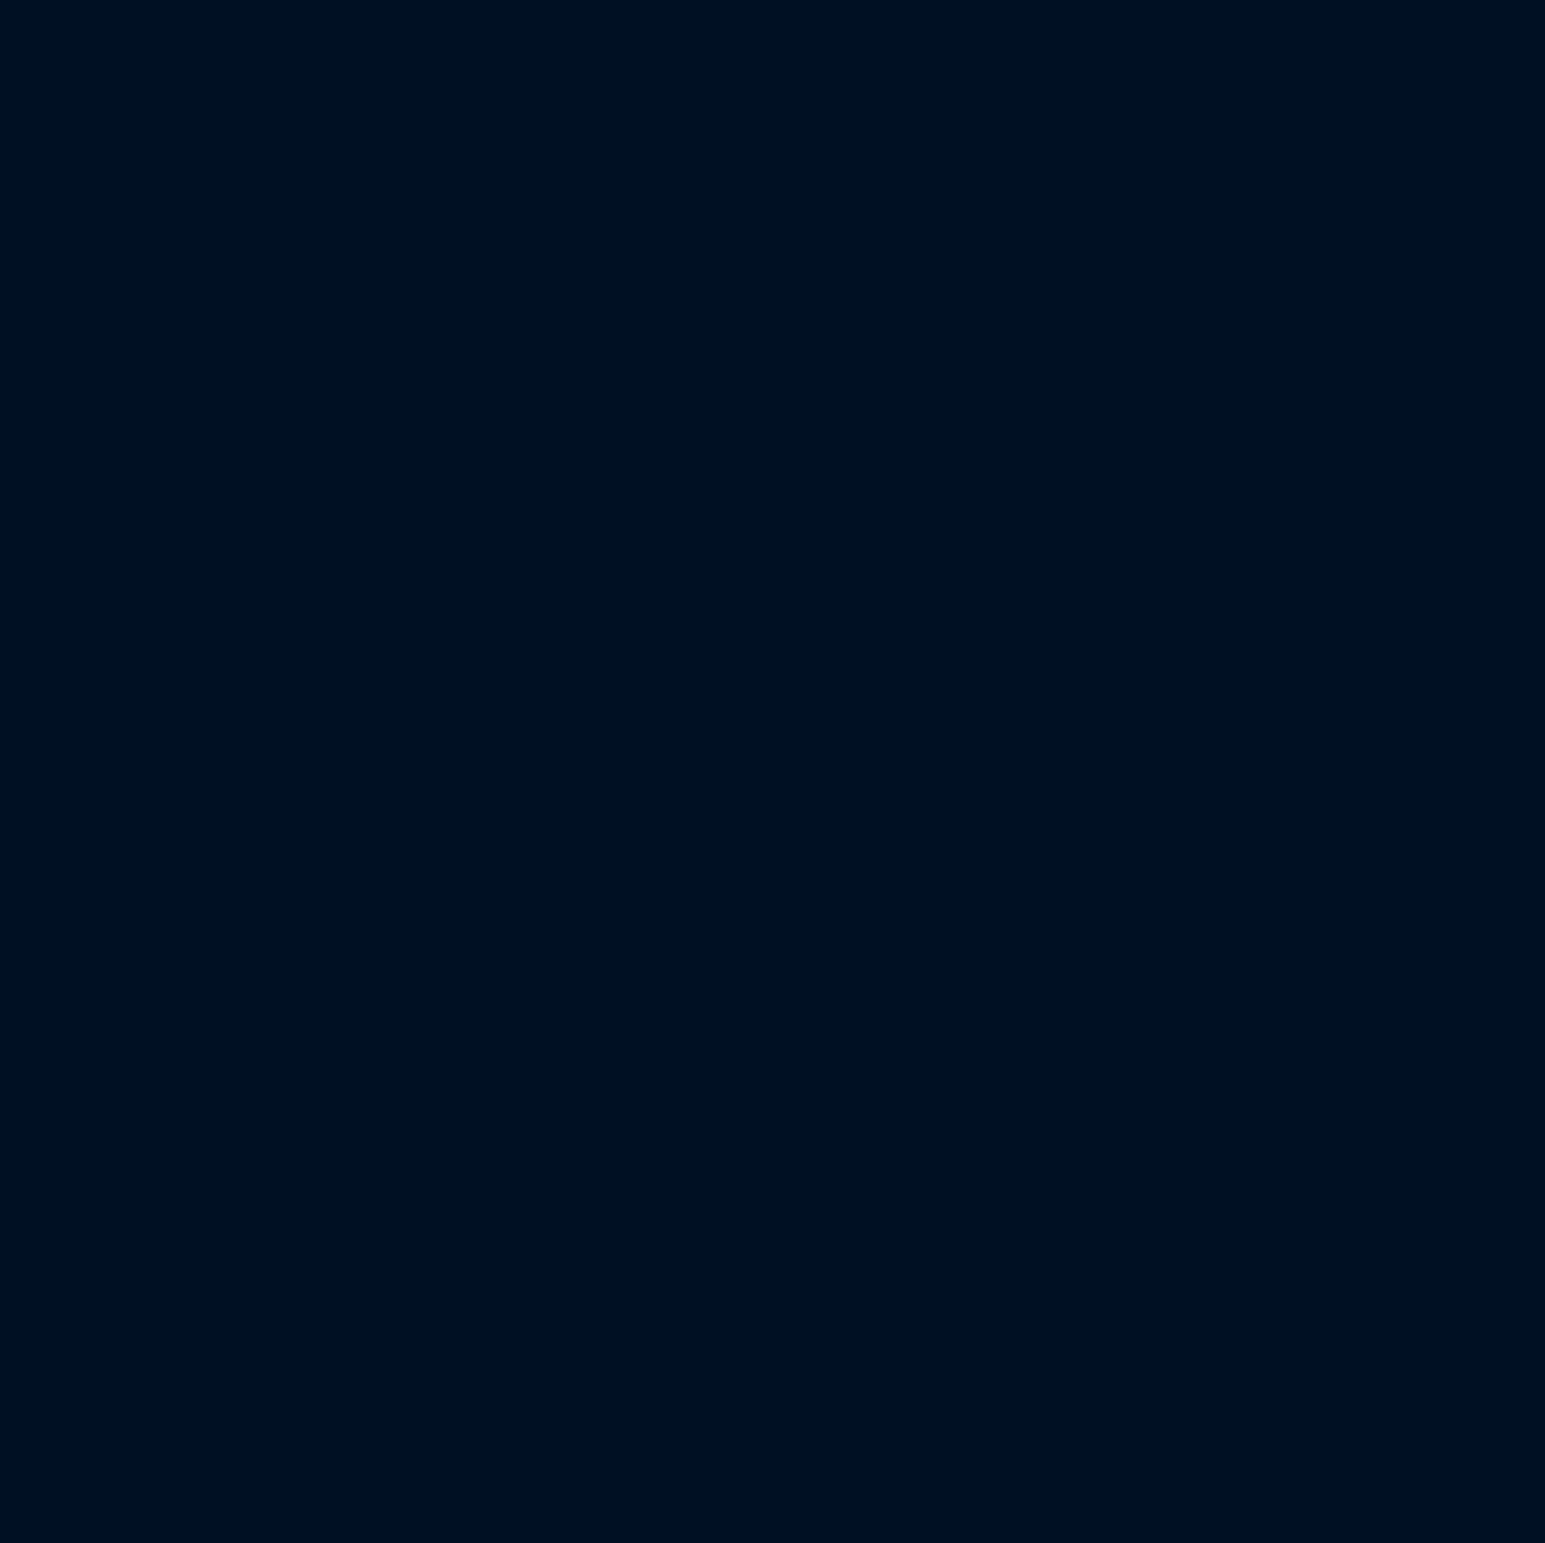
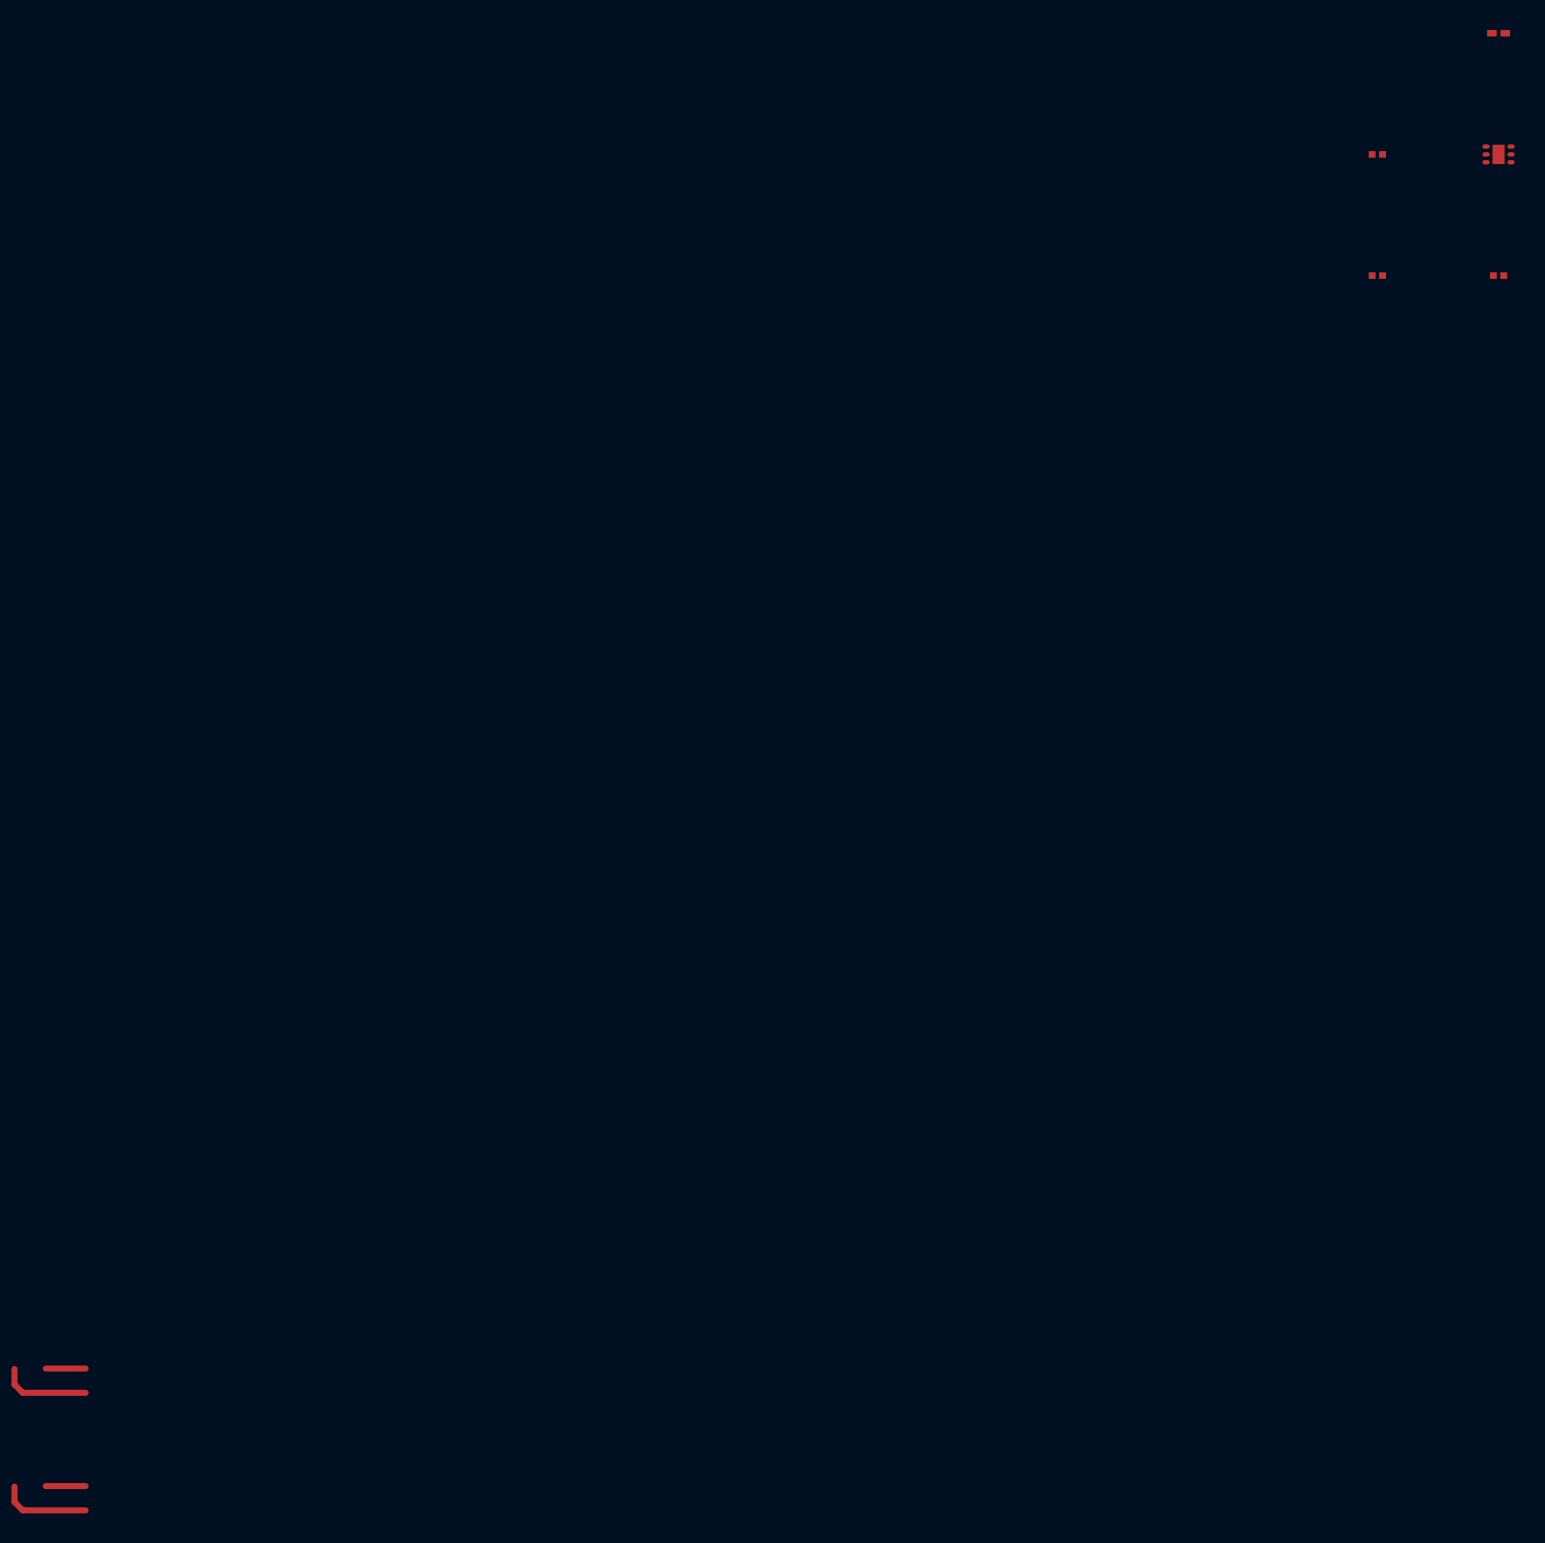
part: none -> (1498, 33)
part: none -> (1377, 154)
part: none -> (1498, 154)
part: none -> (1377, 275)
part: none -> (1498, 275)
top track: none -> (85, 1368) (45, 1369)
top track: none -> (14, 1369) (14, 1384) (22, 1392) (85, 1392)
top track: none -> (14, 1486) (14, 1502) (22, 1510) (85, 1510)
top track: none -> (85, 1486) (45, 1486)

